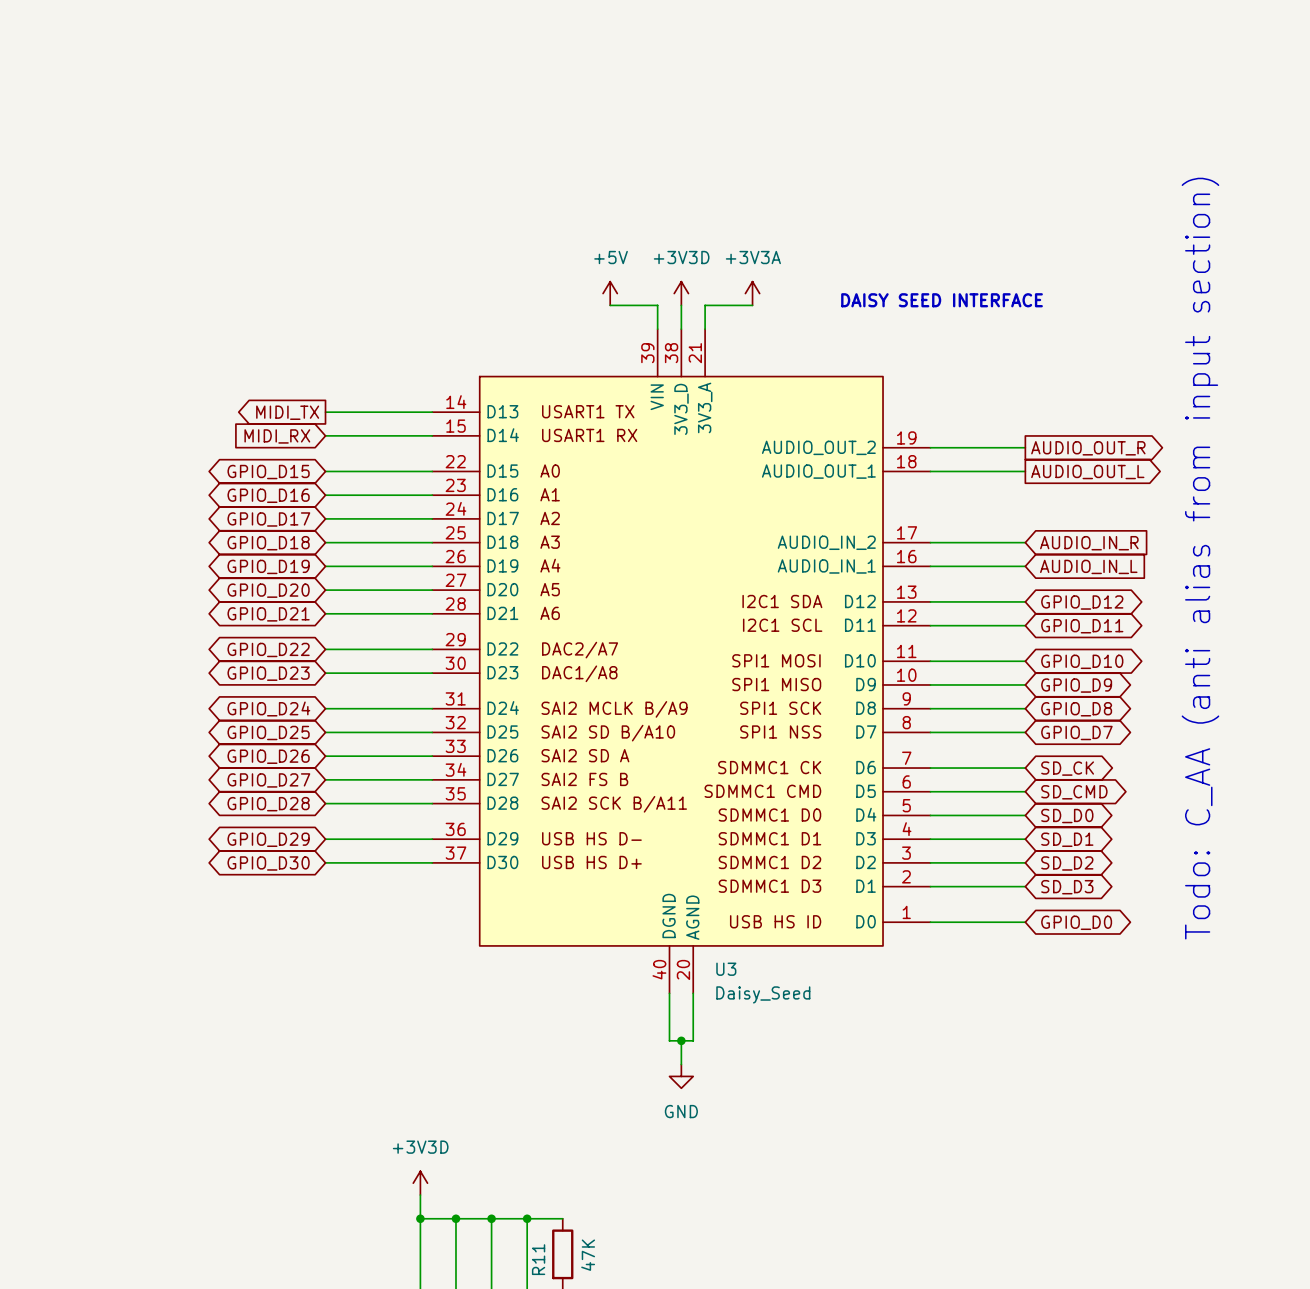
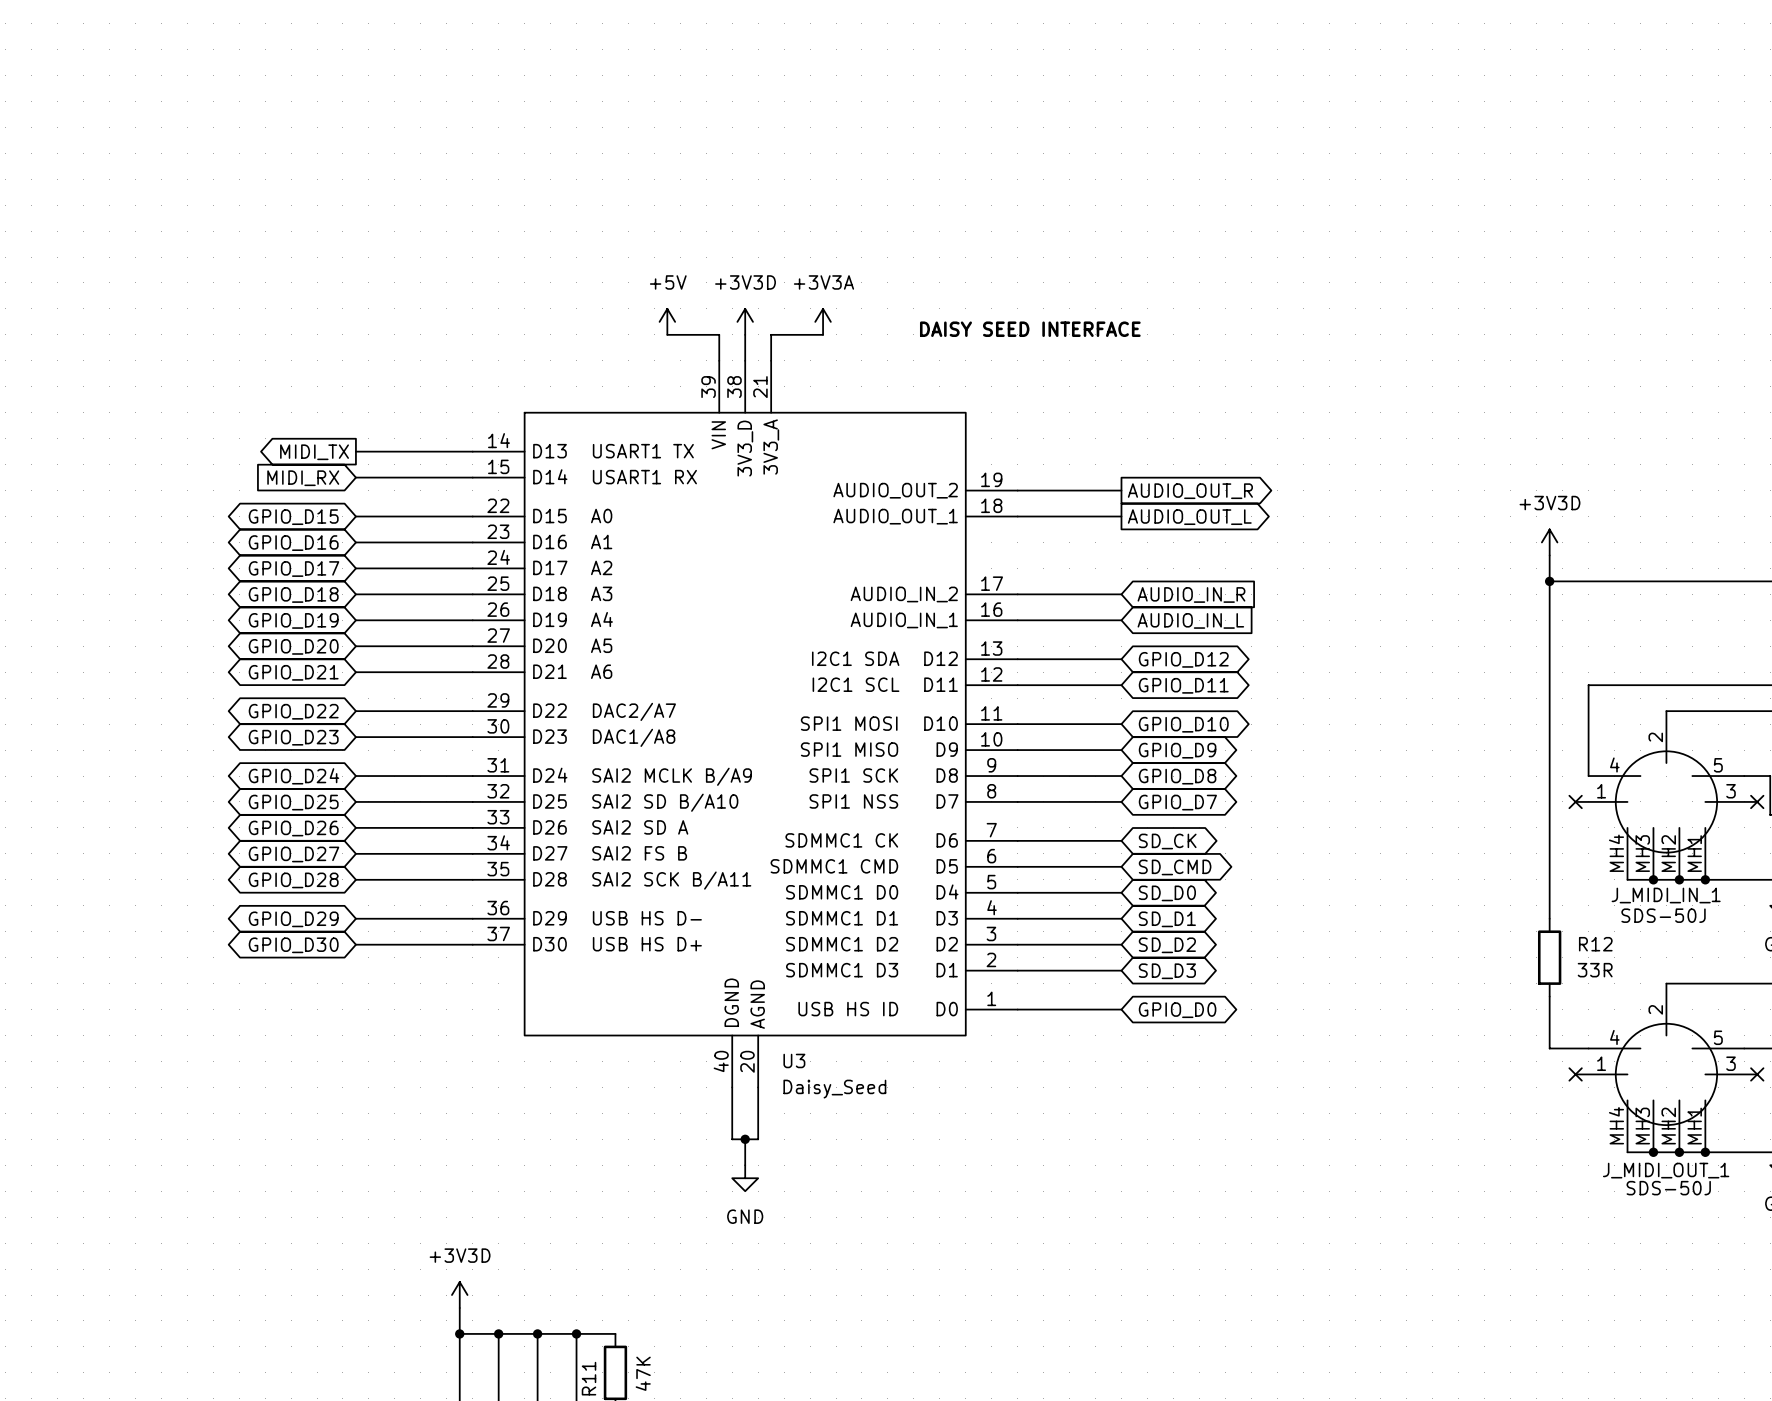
text: Todo: C_AA (anti alias from input section) (1200, 558) -> none

